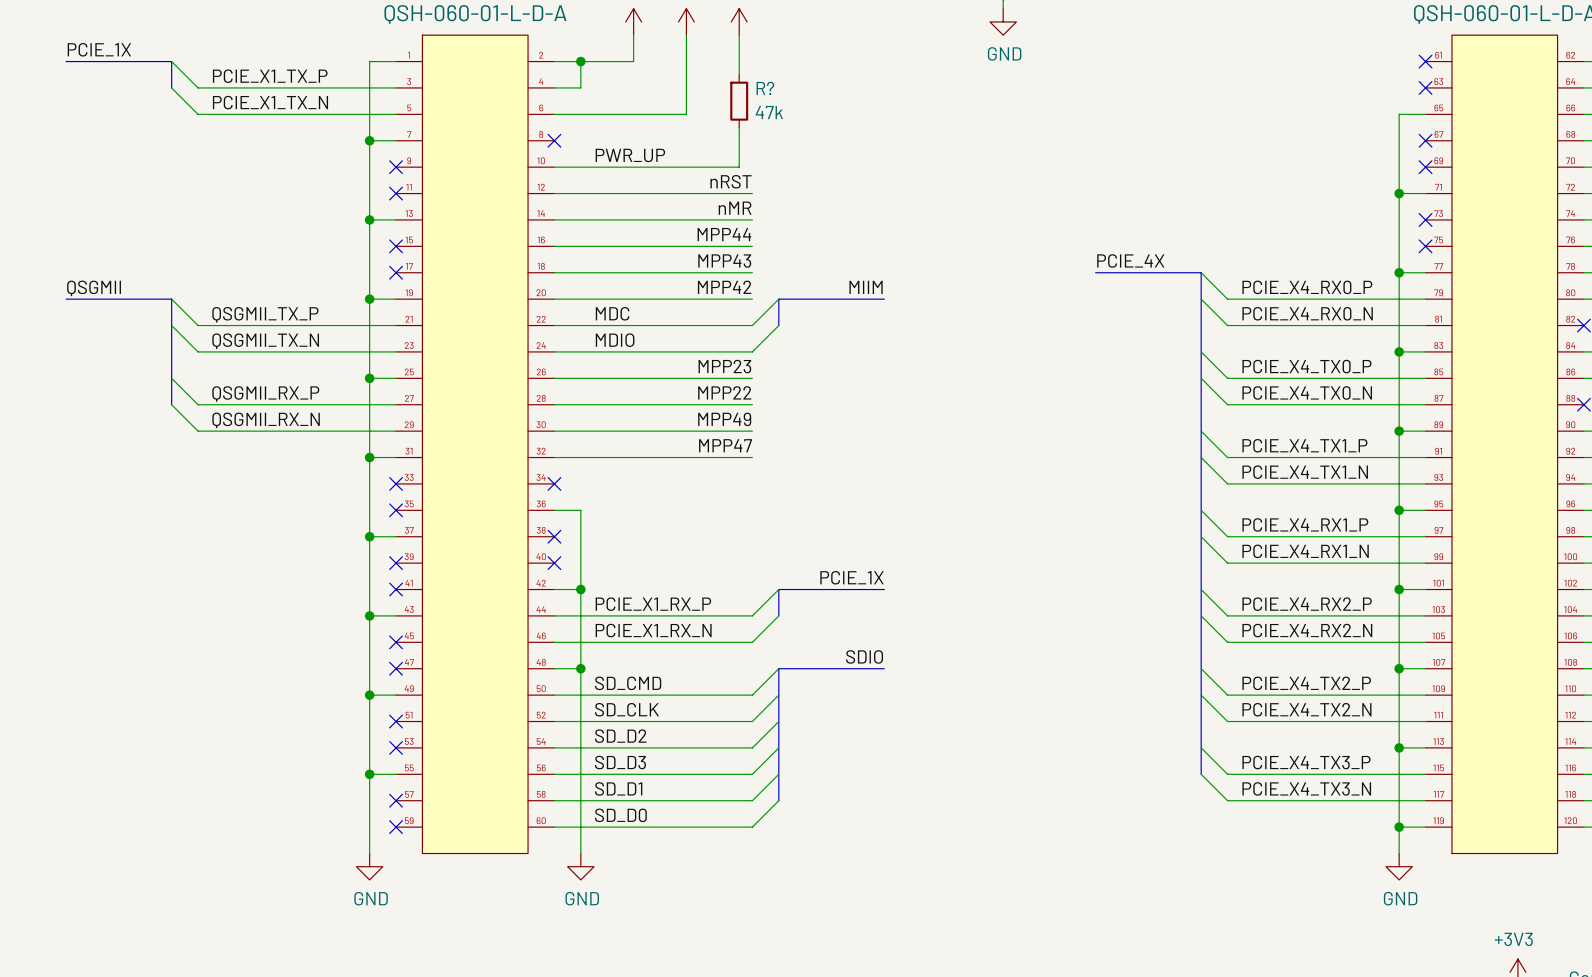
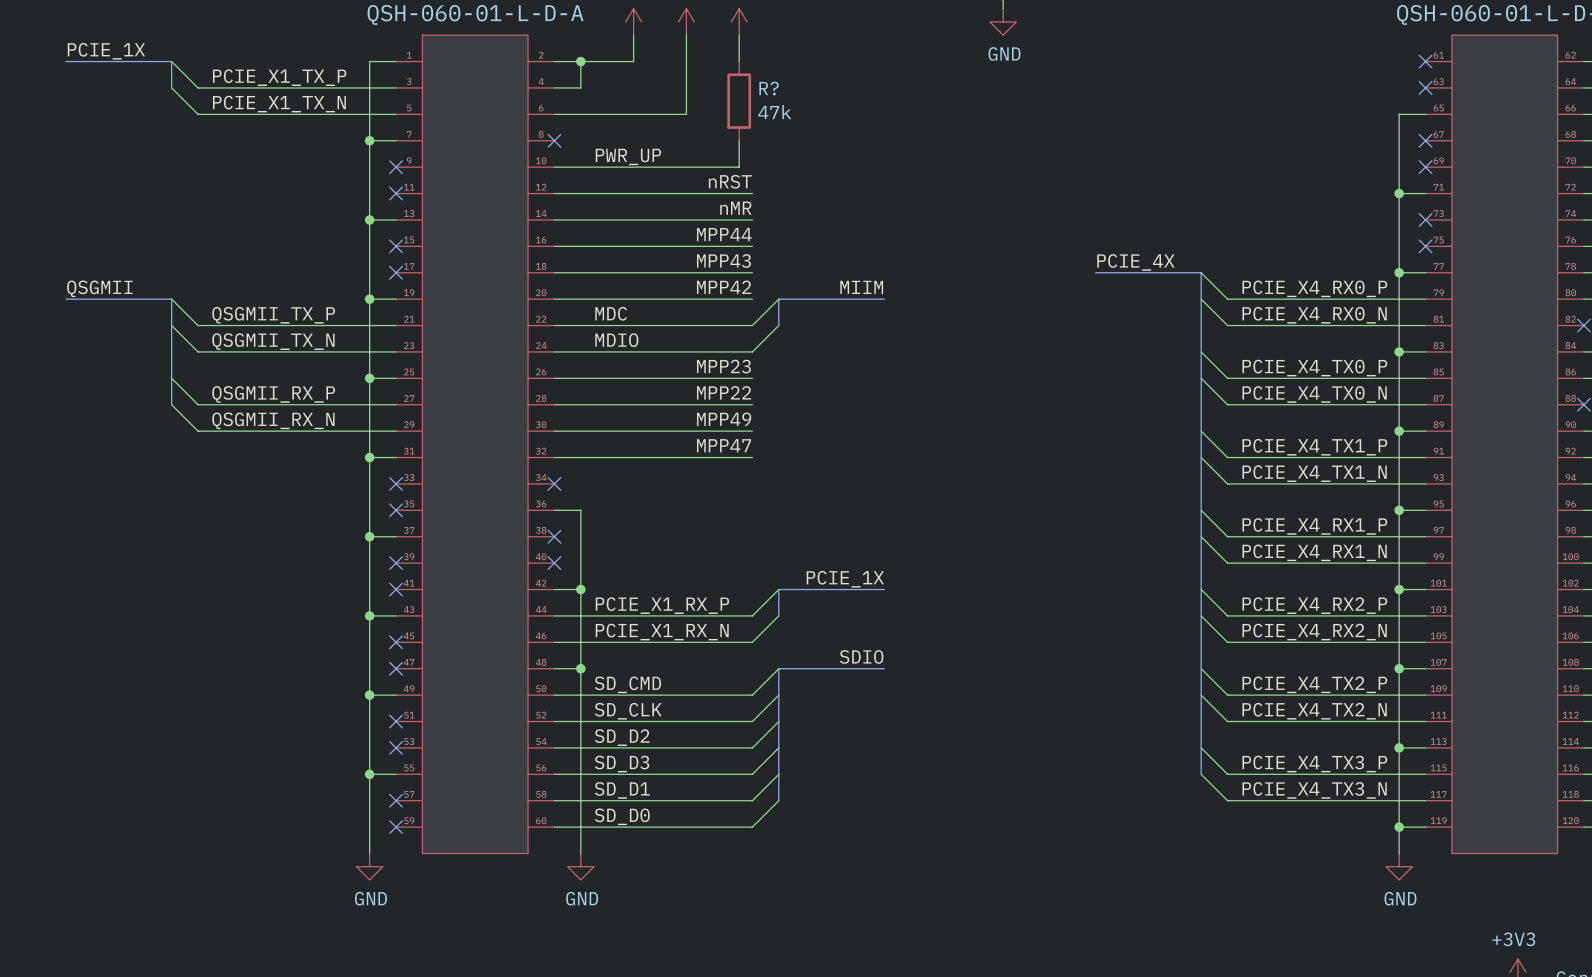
R? symbol: [730, 74, 749, 128] -> [727, 61, 752, 141]

